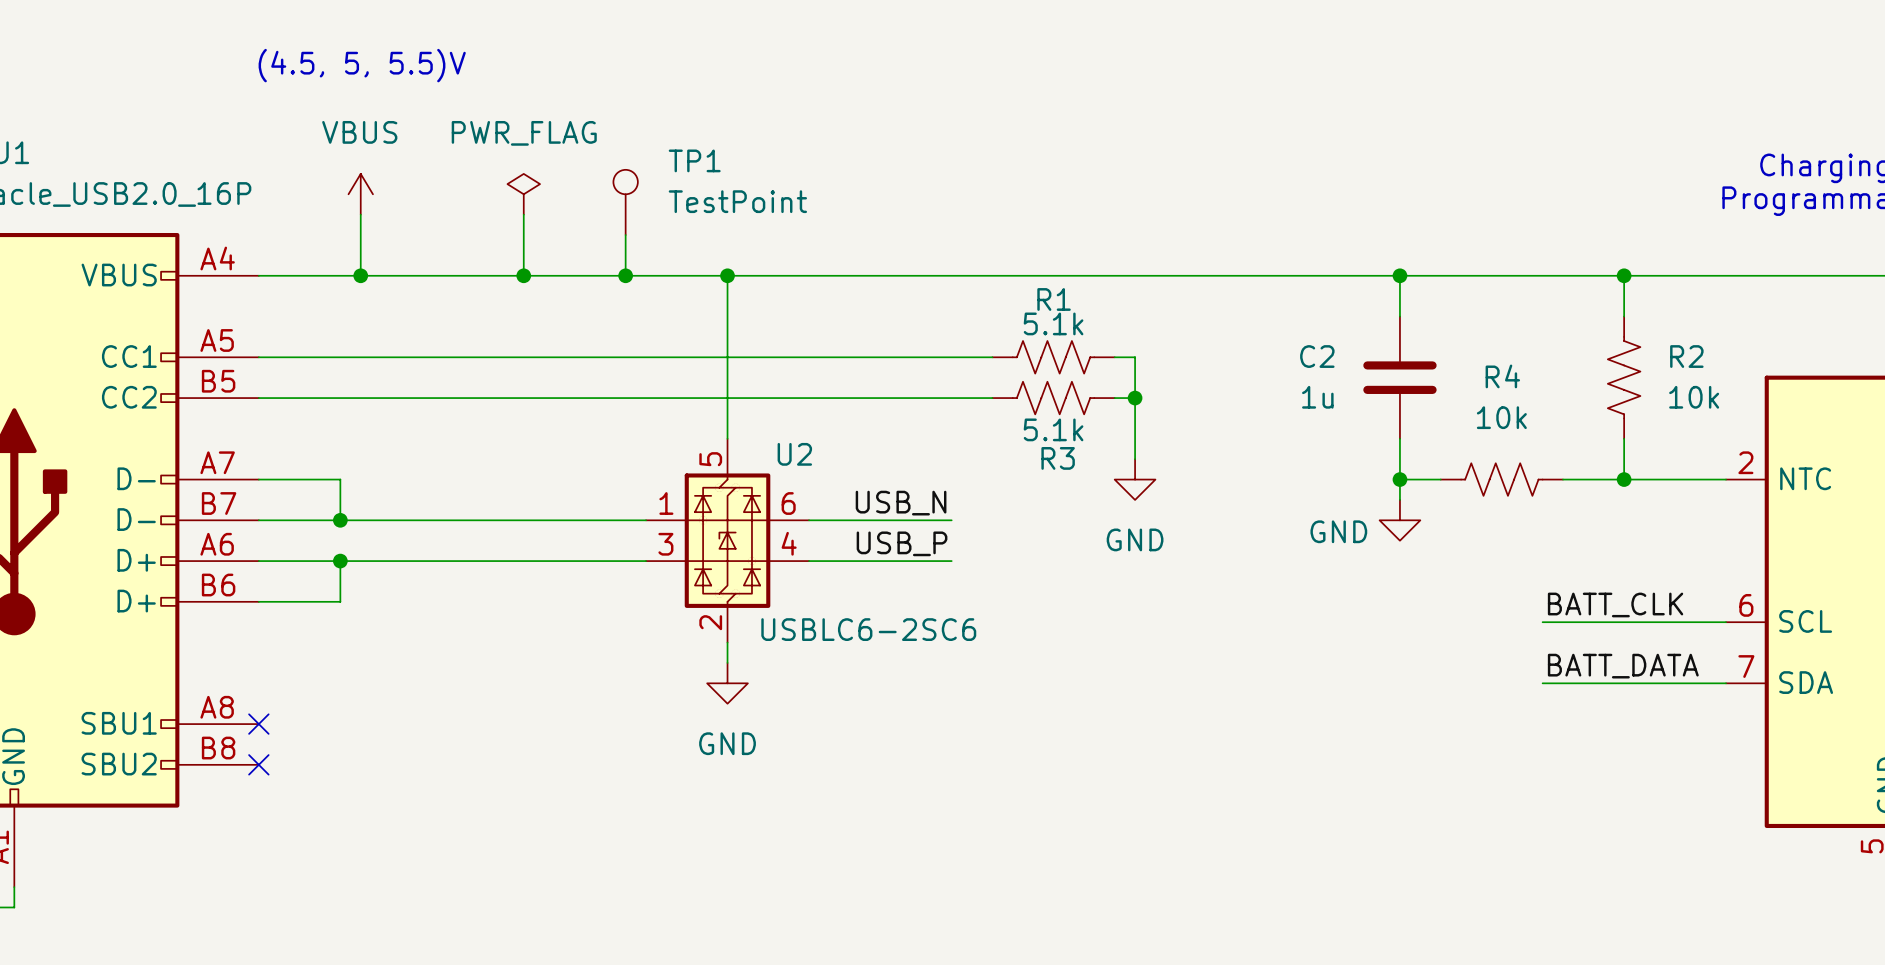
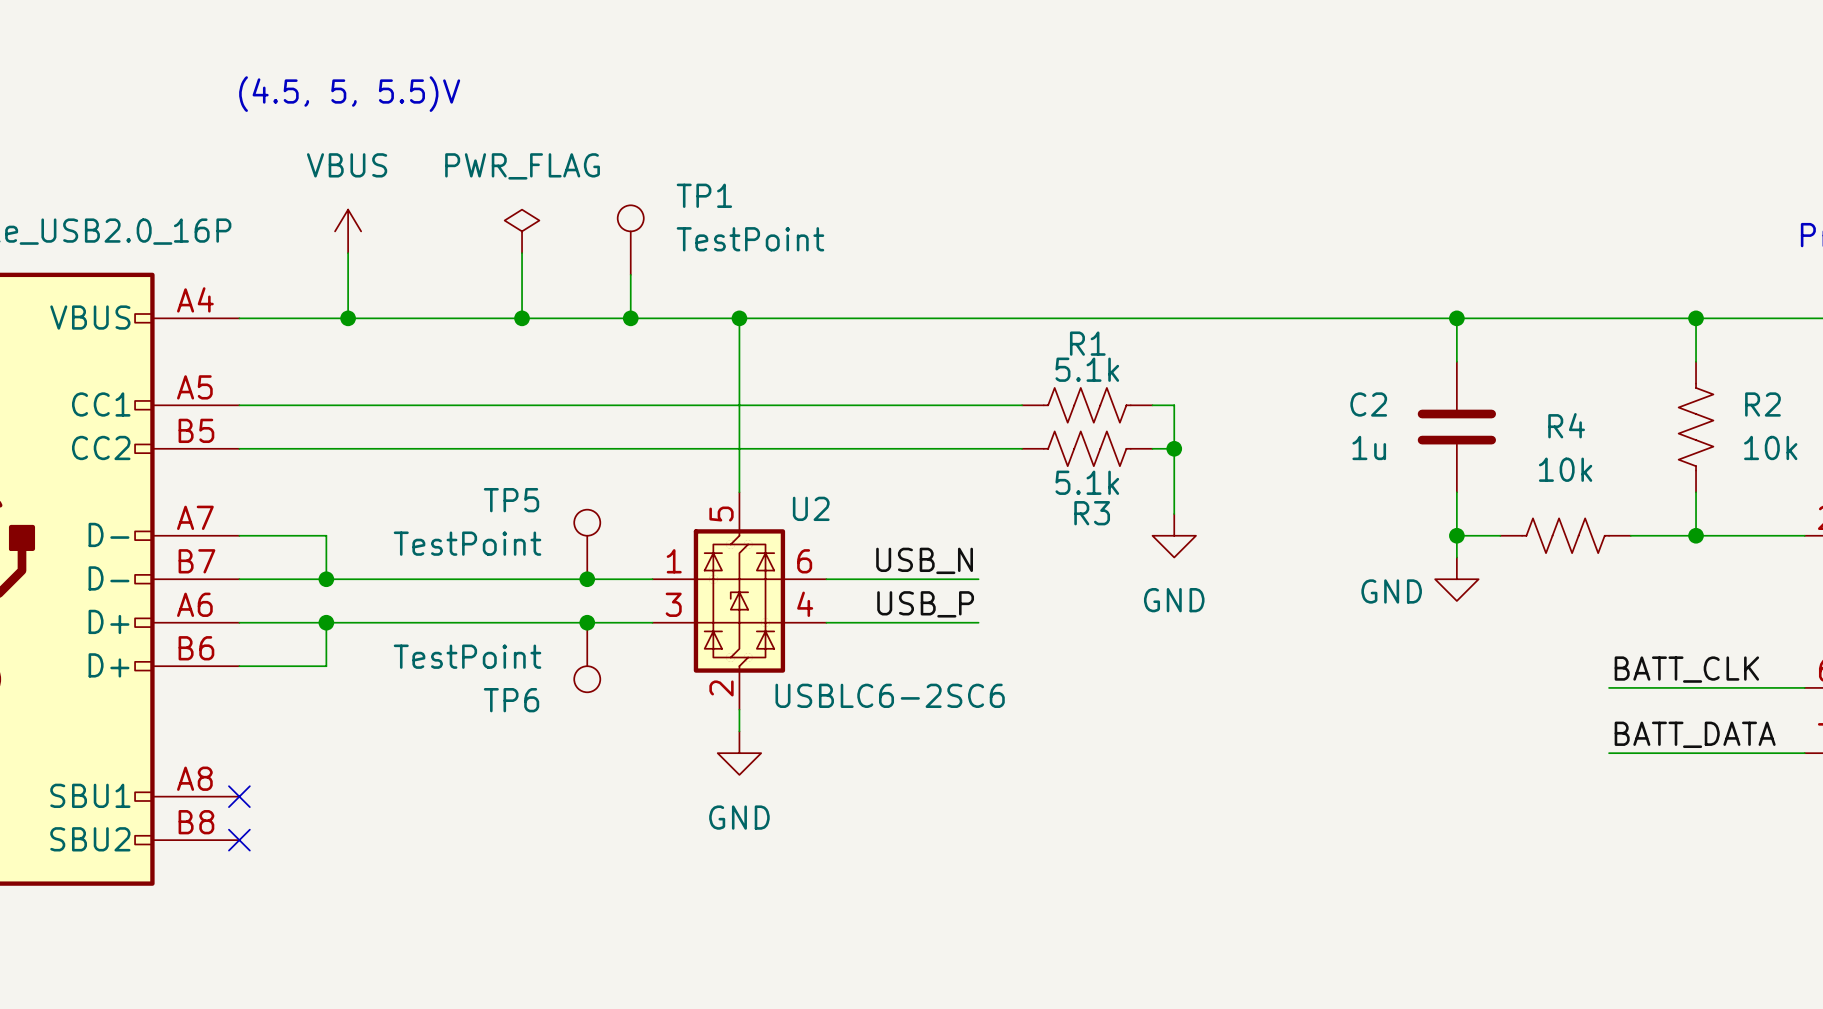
TP5: none -> TestPoint (587, 544)
junction: none -> (587, 579)
junction: none -> (587, 622)
TP6: none -> TestPoint (587, 657)

